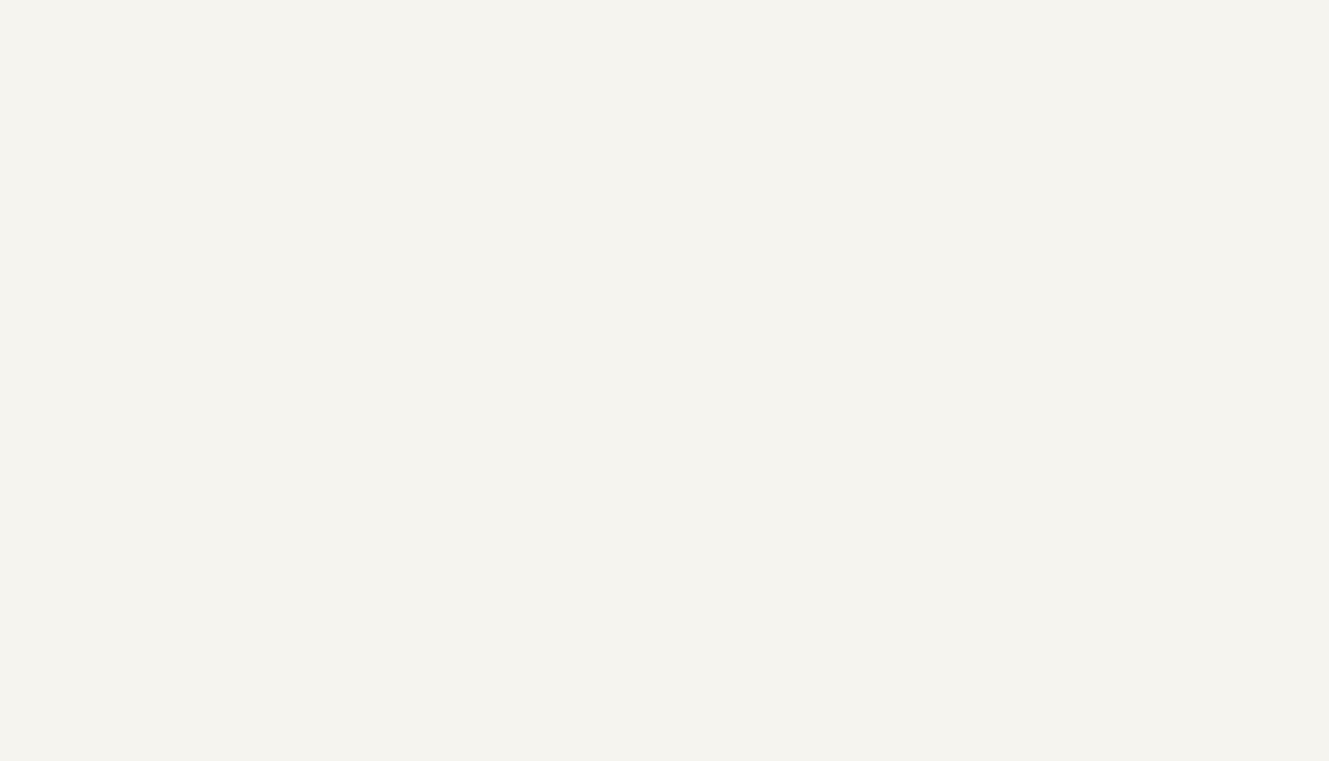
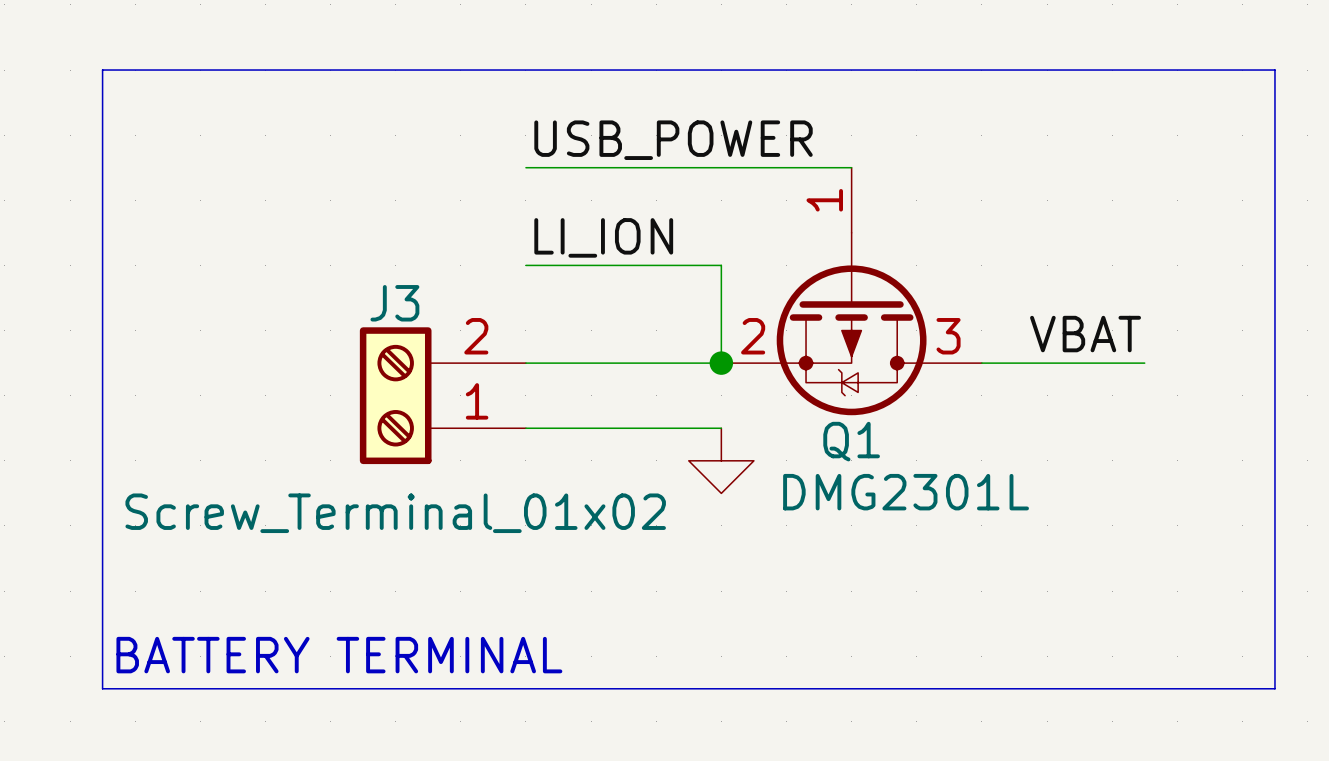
line: none -> (102, 70) (1274, 70) (1274, 688) (102, 688) (102, 70)
label: none -> USB_POWER (673, 140)
wire: none -> (525, 167) (851, 167)
label: none -> LI_ION (603, 237)
wire: none -> (525, 265) (721, 265) (721, 363) (525, 363)
Q1: none -> DMG2301L (851, 291)
label: none -> VBAT (1085, 334)
junction: none -> (721, 363)
wire: none -> (981, 363) (1144, 363)
J3: none -> Screw_Terminal_01x02 (442, 395)
wire: none -> (525, 428) (721, 428)
power symbol: none -> (721, 460)
text: none -> BATTERY TERMINAL (339, 655)

